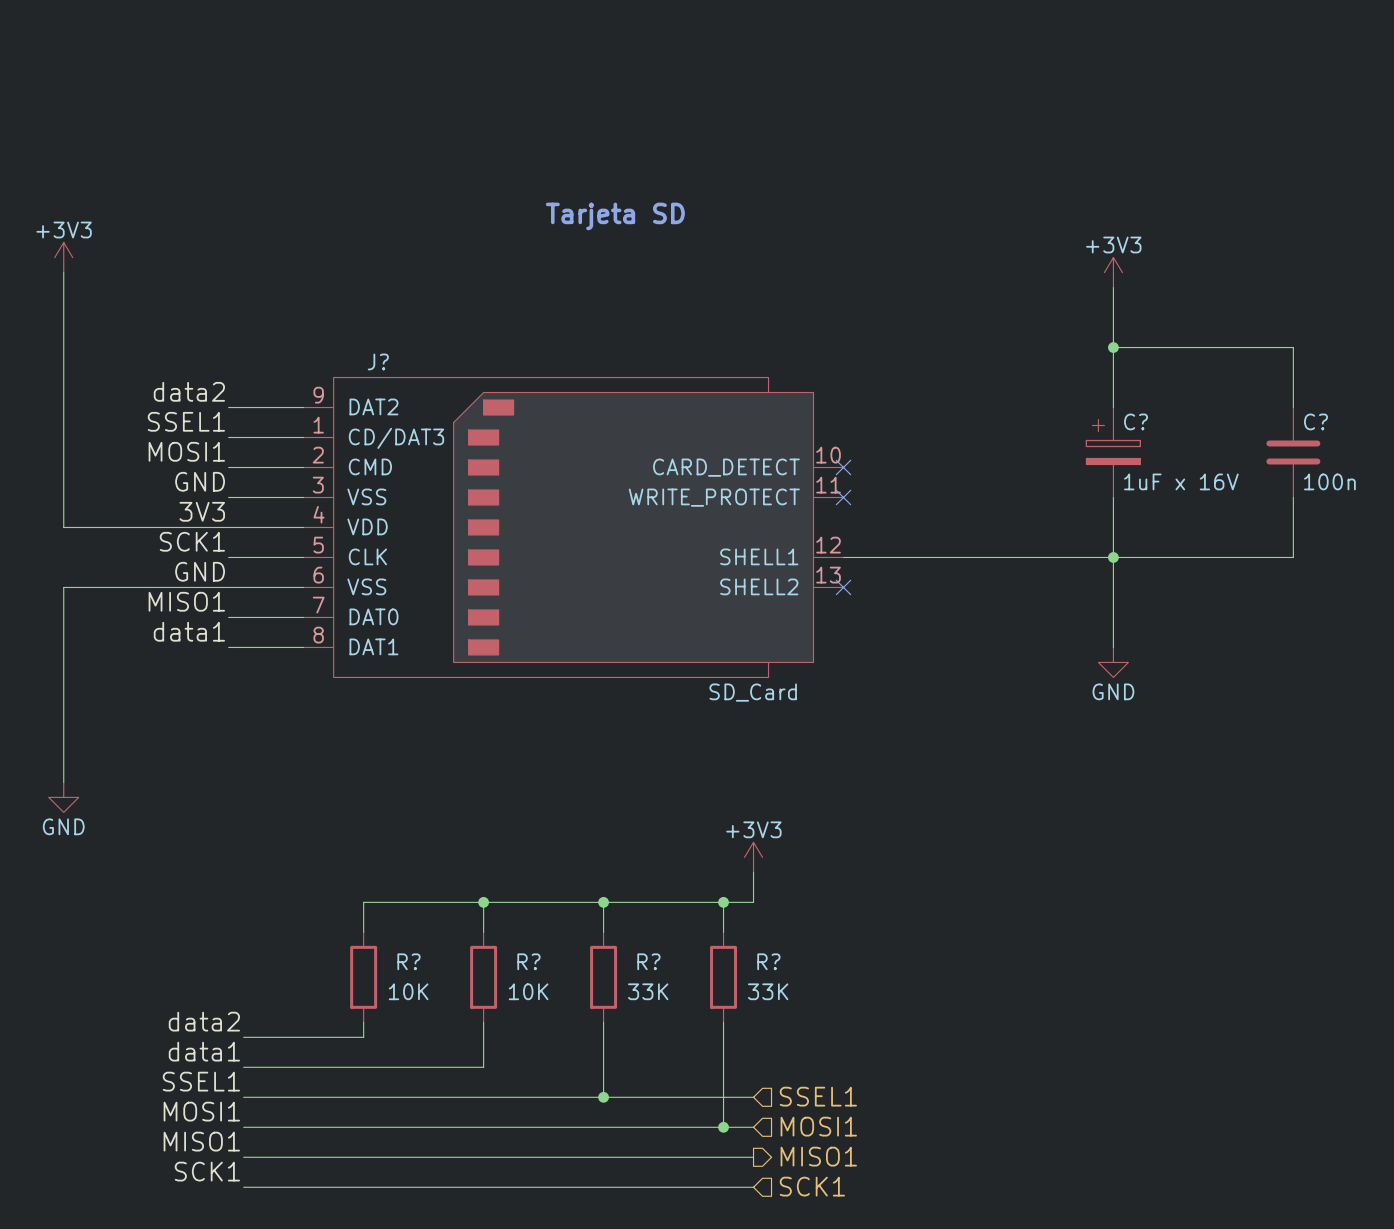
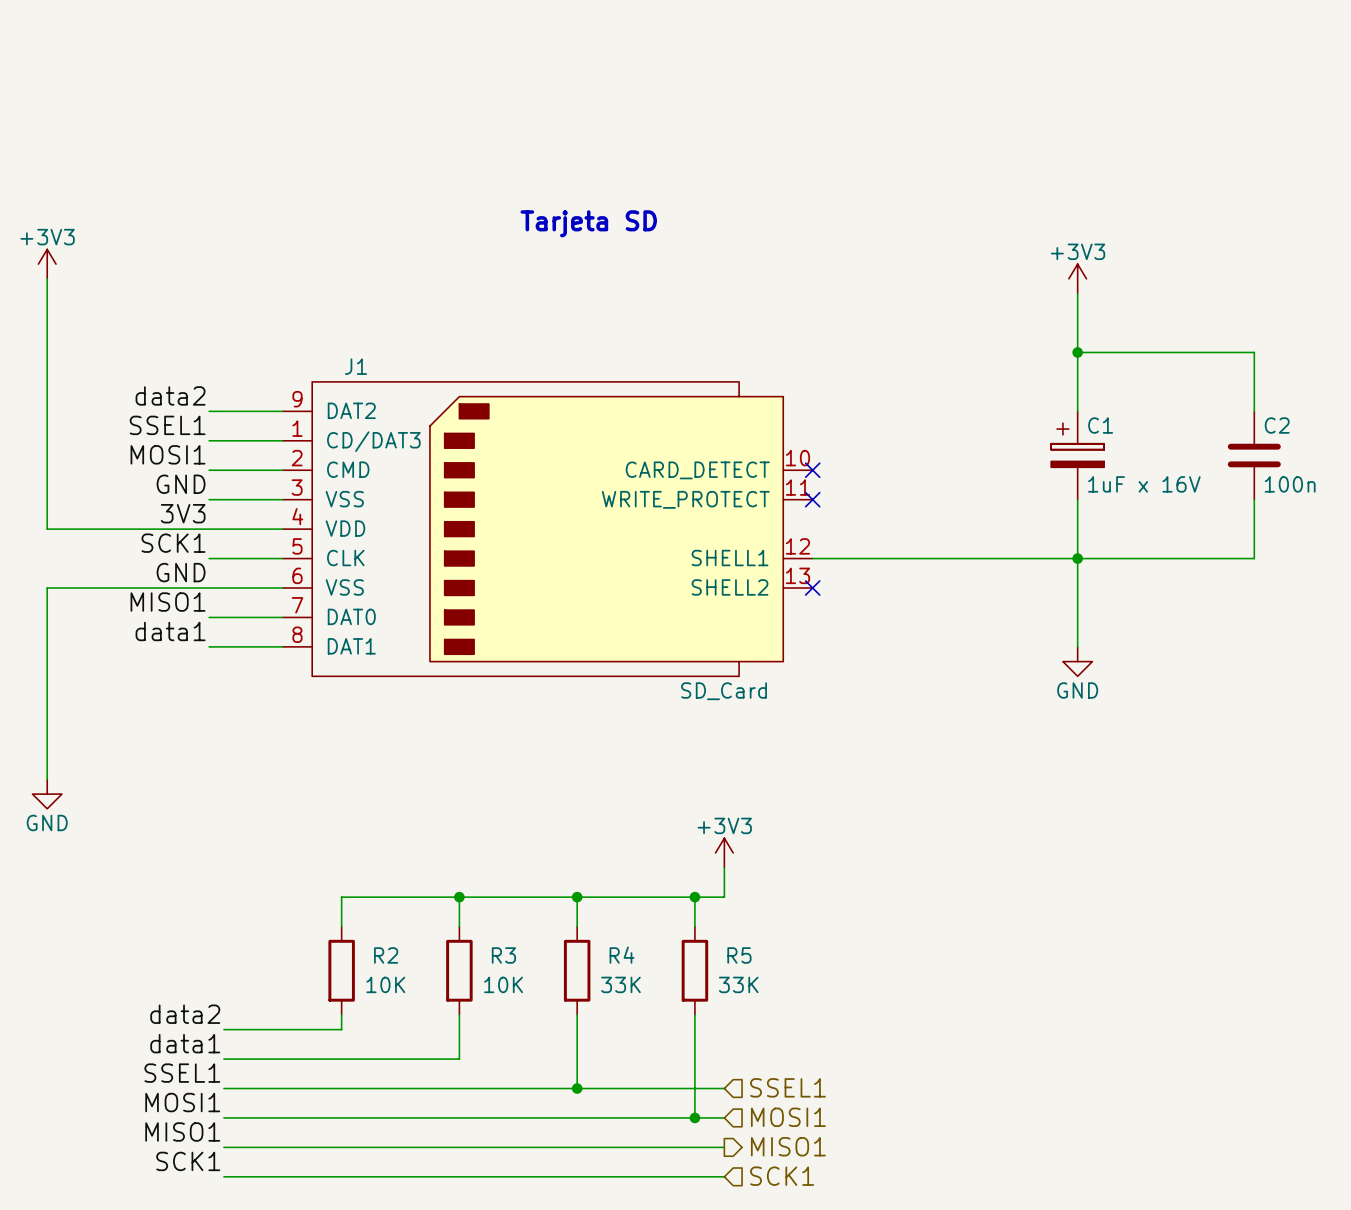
J? name: J? (378, 361) -> J1 (356, 366)
C? name: C? (1136, 421) -> C1 (1100, 425)
C? name: C? (1315, 421) -> C2 (1277, 425)
R? name: R? (408, 961) -> R2 (386, 955)
R? name: R? (528, 961) -> R3 (503, 955)
R? name: R? (648, 961) -> R4 (622, 955)
R? name: R? (768, 961) -> R5 (739, 955)

